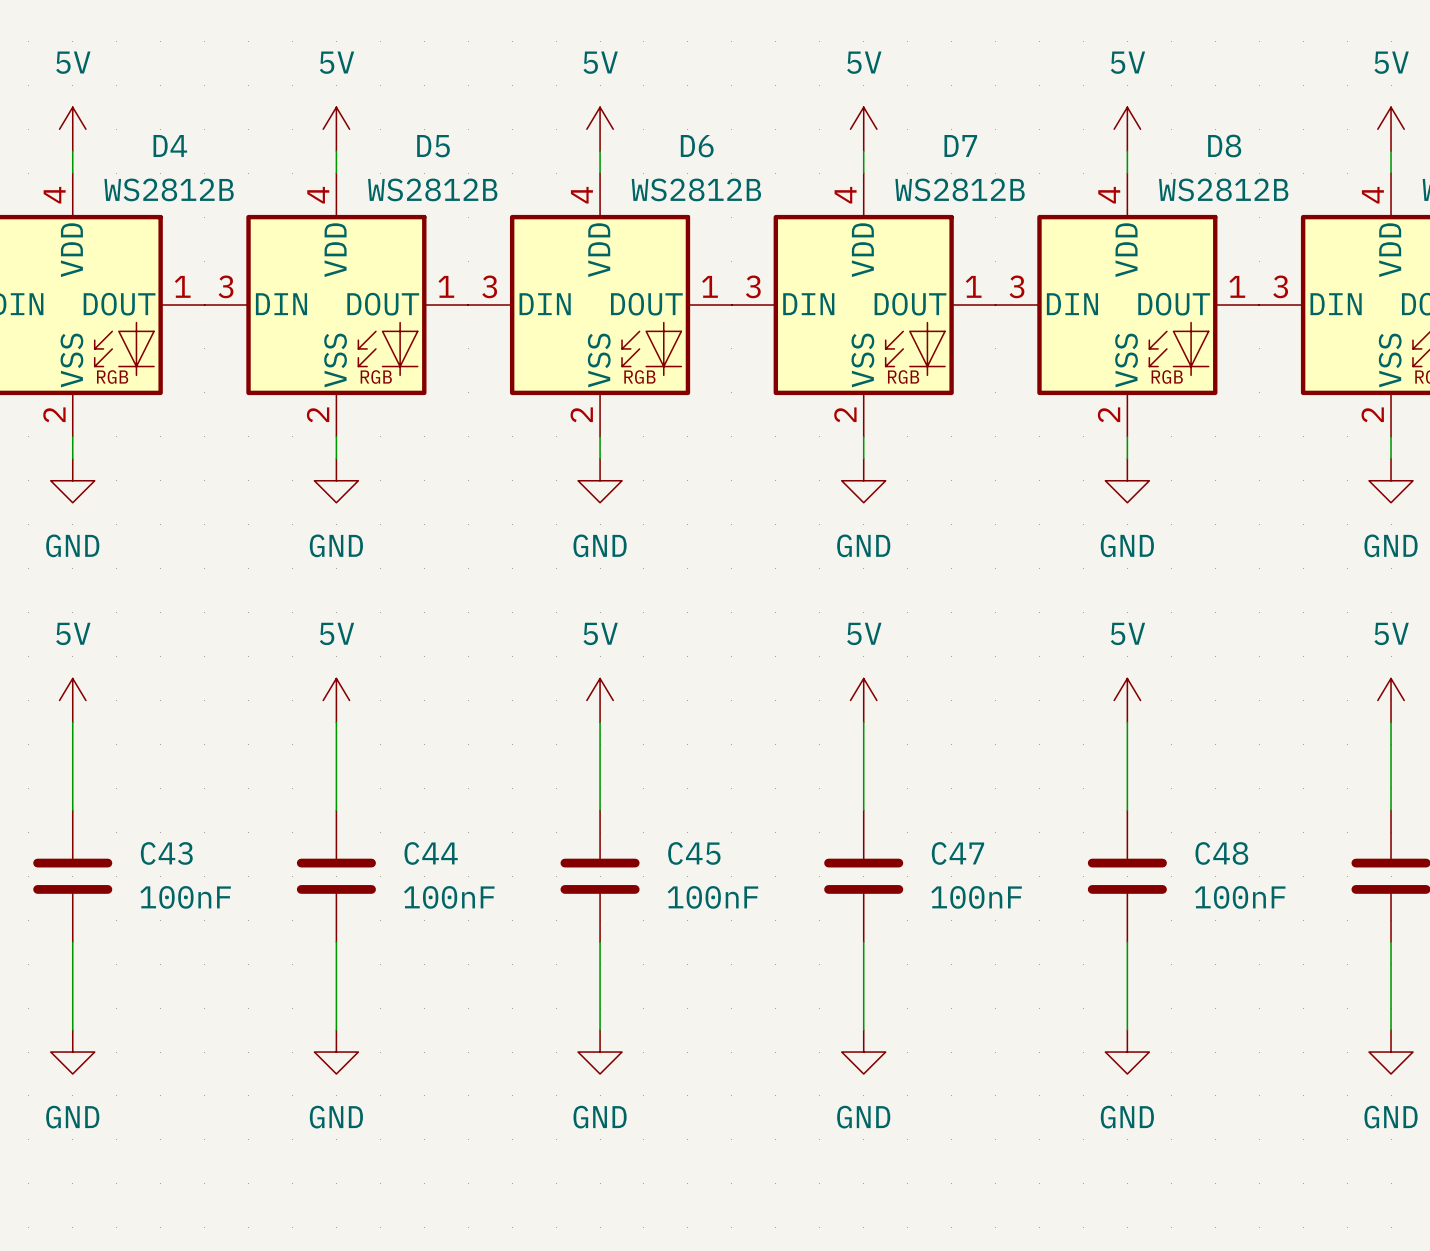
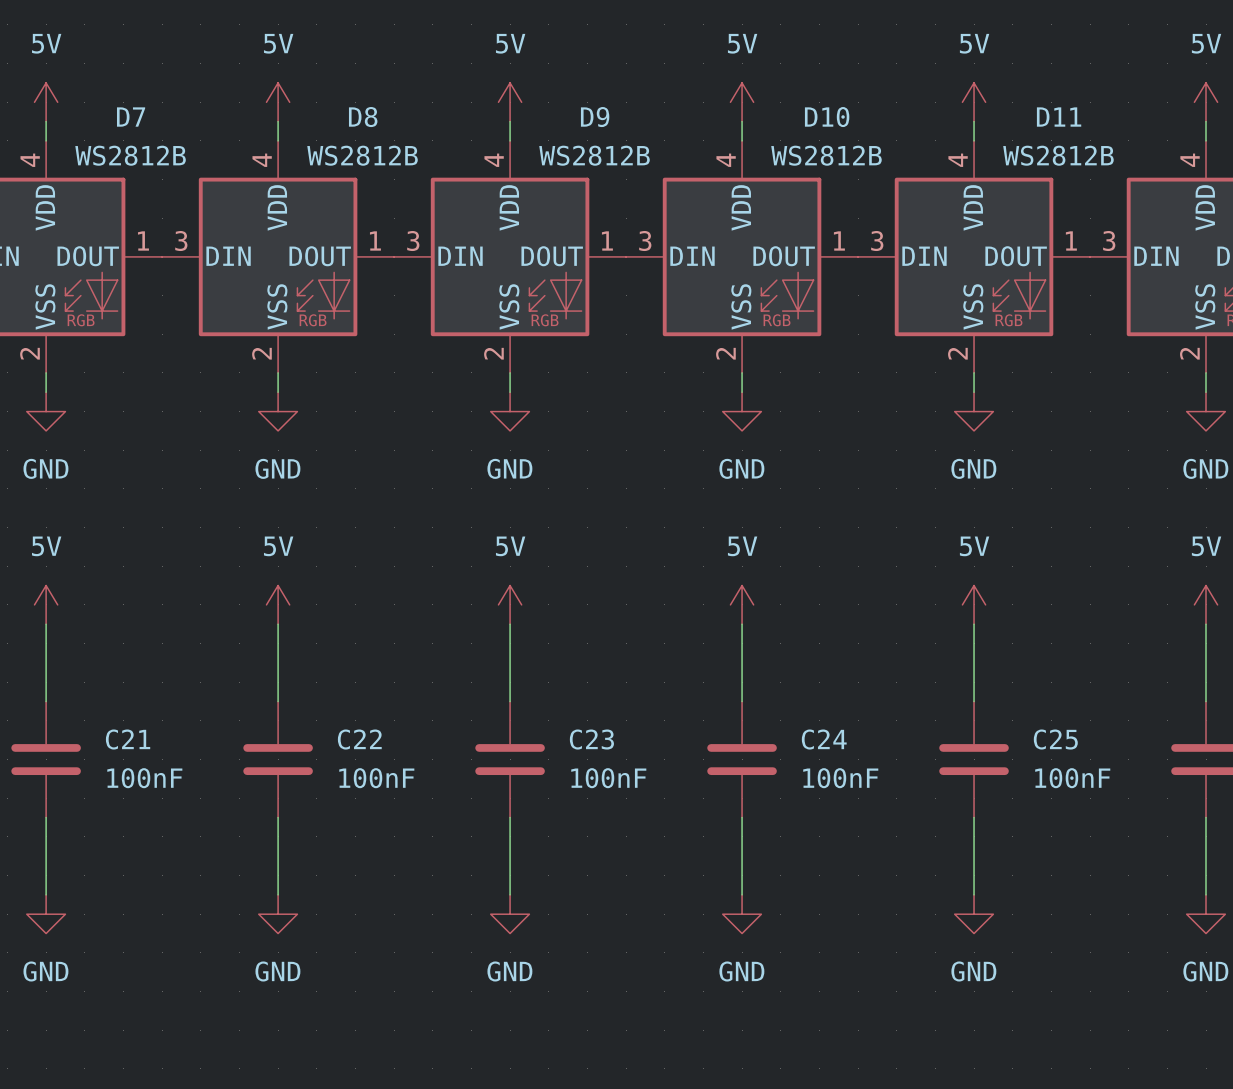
D4 name: D4 (170, 145) -> D7 (131, 117)
D7 name: D7 (960, 145) -> D10 (827, 117)
D8 name: D8 (1224, 145) -> D11 (1059, 117)
D5 name: D5 (433, 146) -> D8 (363, 117)
D6 name: D6 (697, 146) -> D9 (595, 117)
C43 name: C43 (166, 853) -> C21 (128, 739)
C44 name: C44 (431, 853) -> C22 (359, 739)
C45 name: C45 (694, 853) -> C23 (591, 739)
C47 name: C47 (957, 853) -> C24 (824, 739)
C48 name: C48 (1221, 853) -> C25 (1055, 739)

